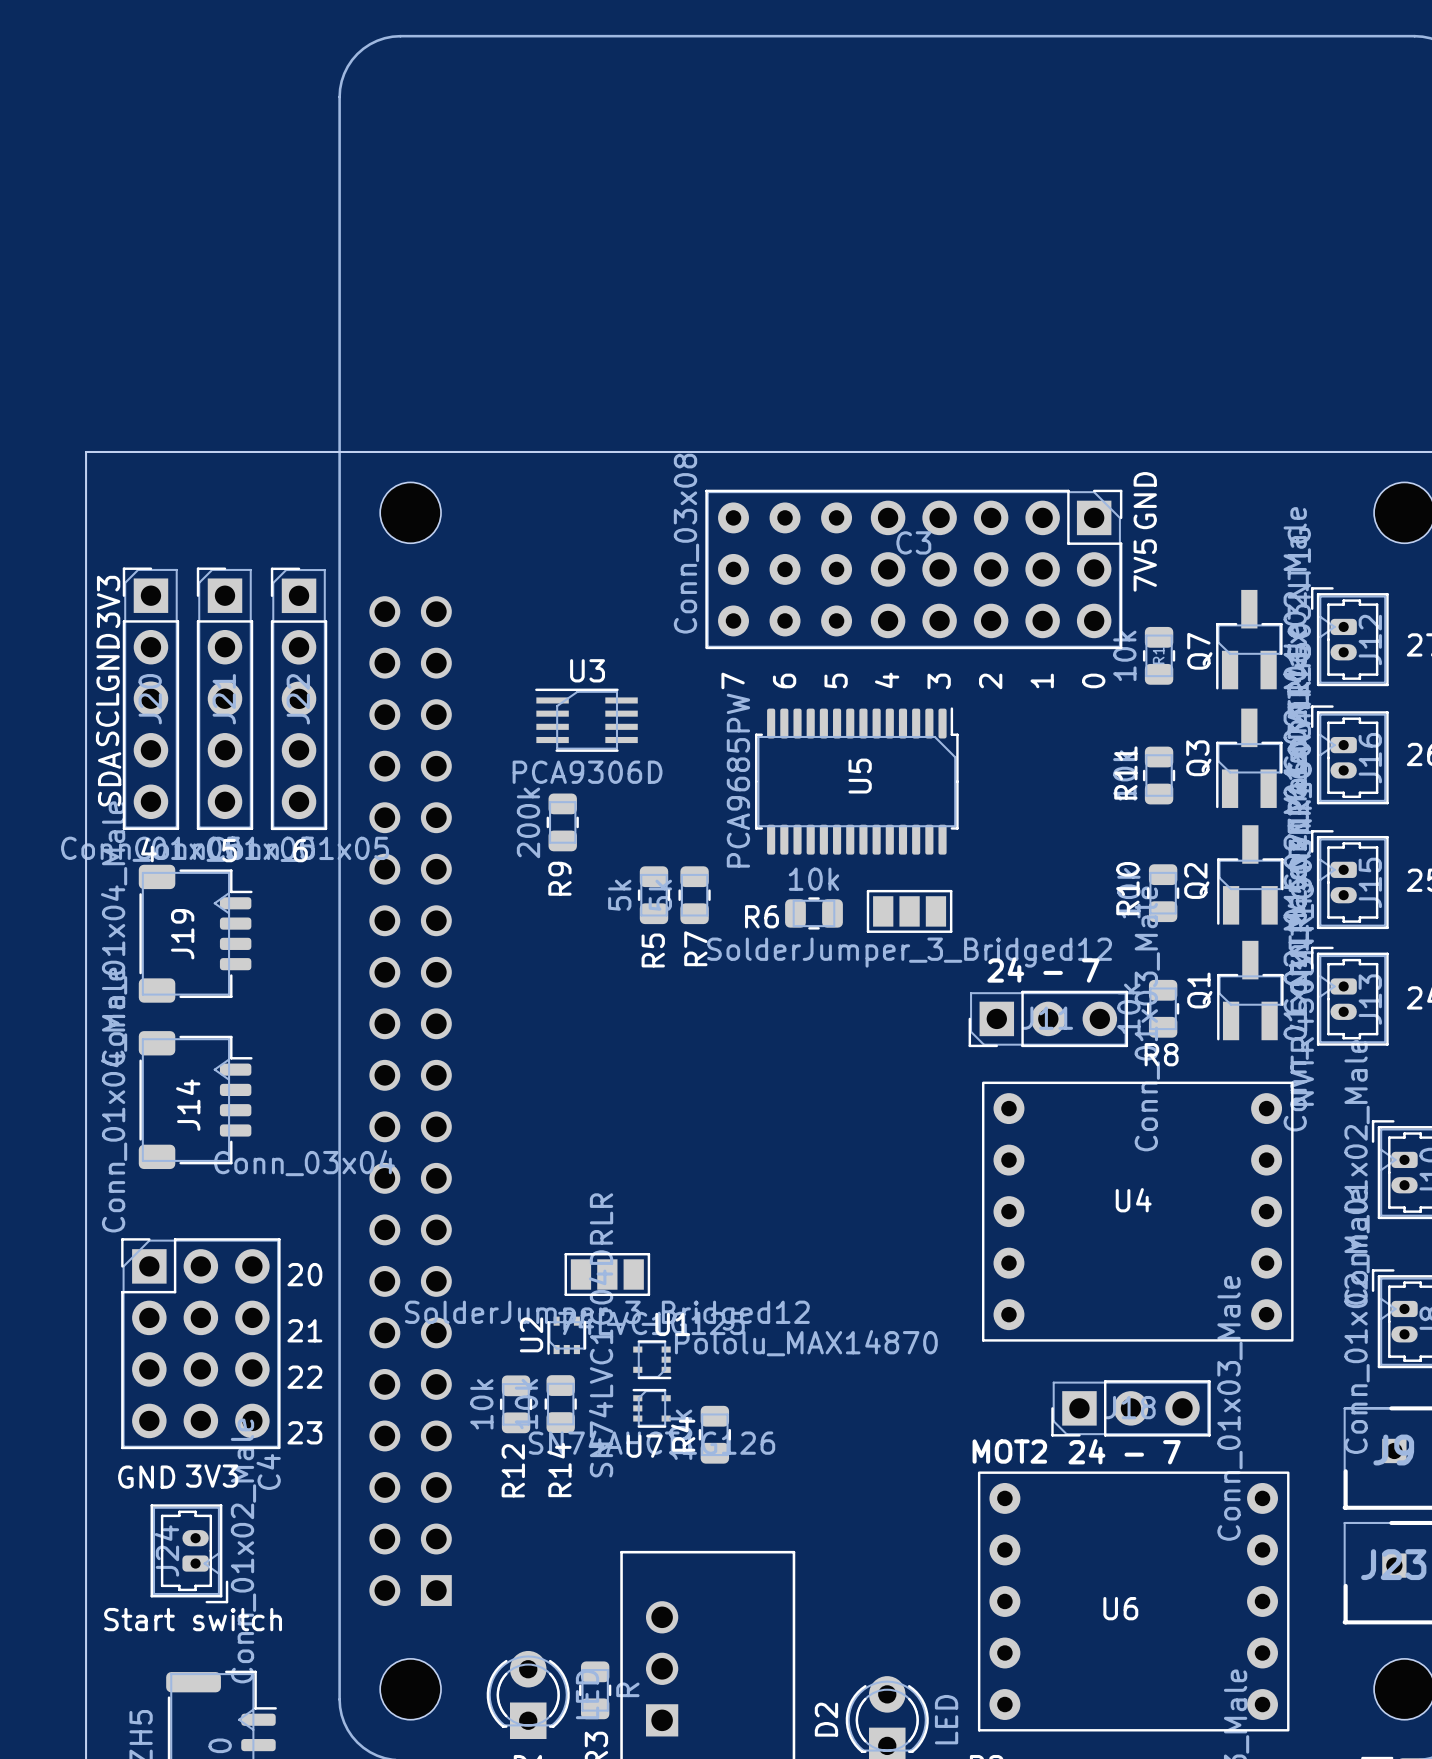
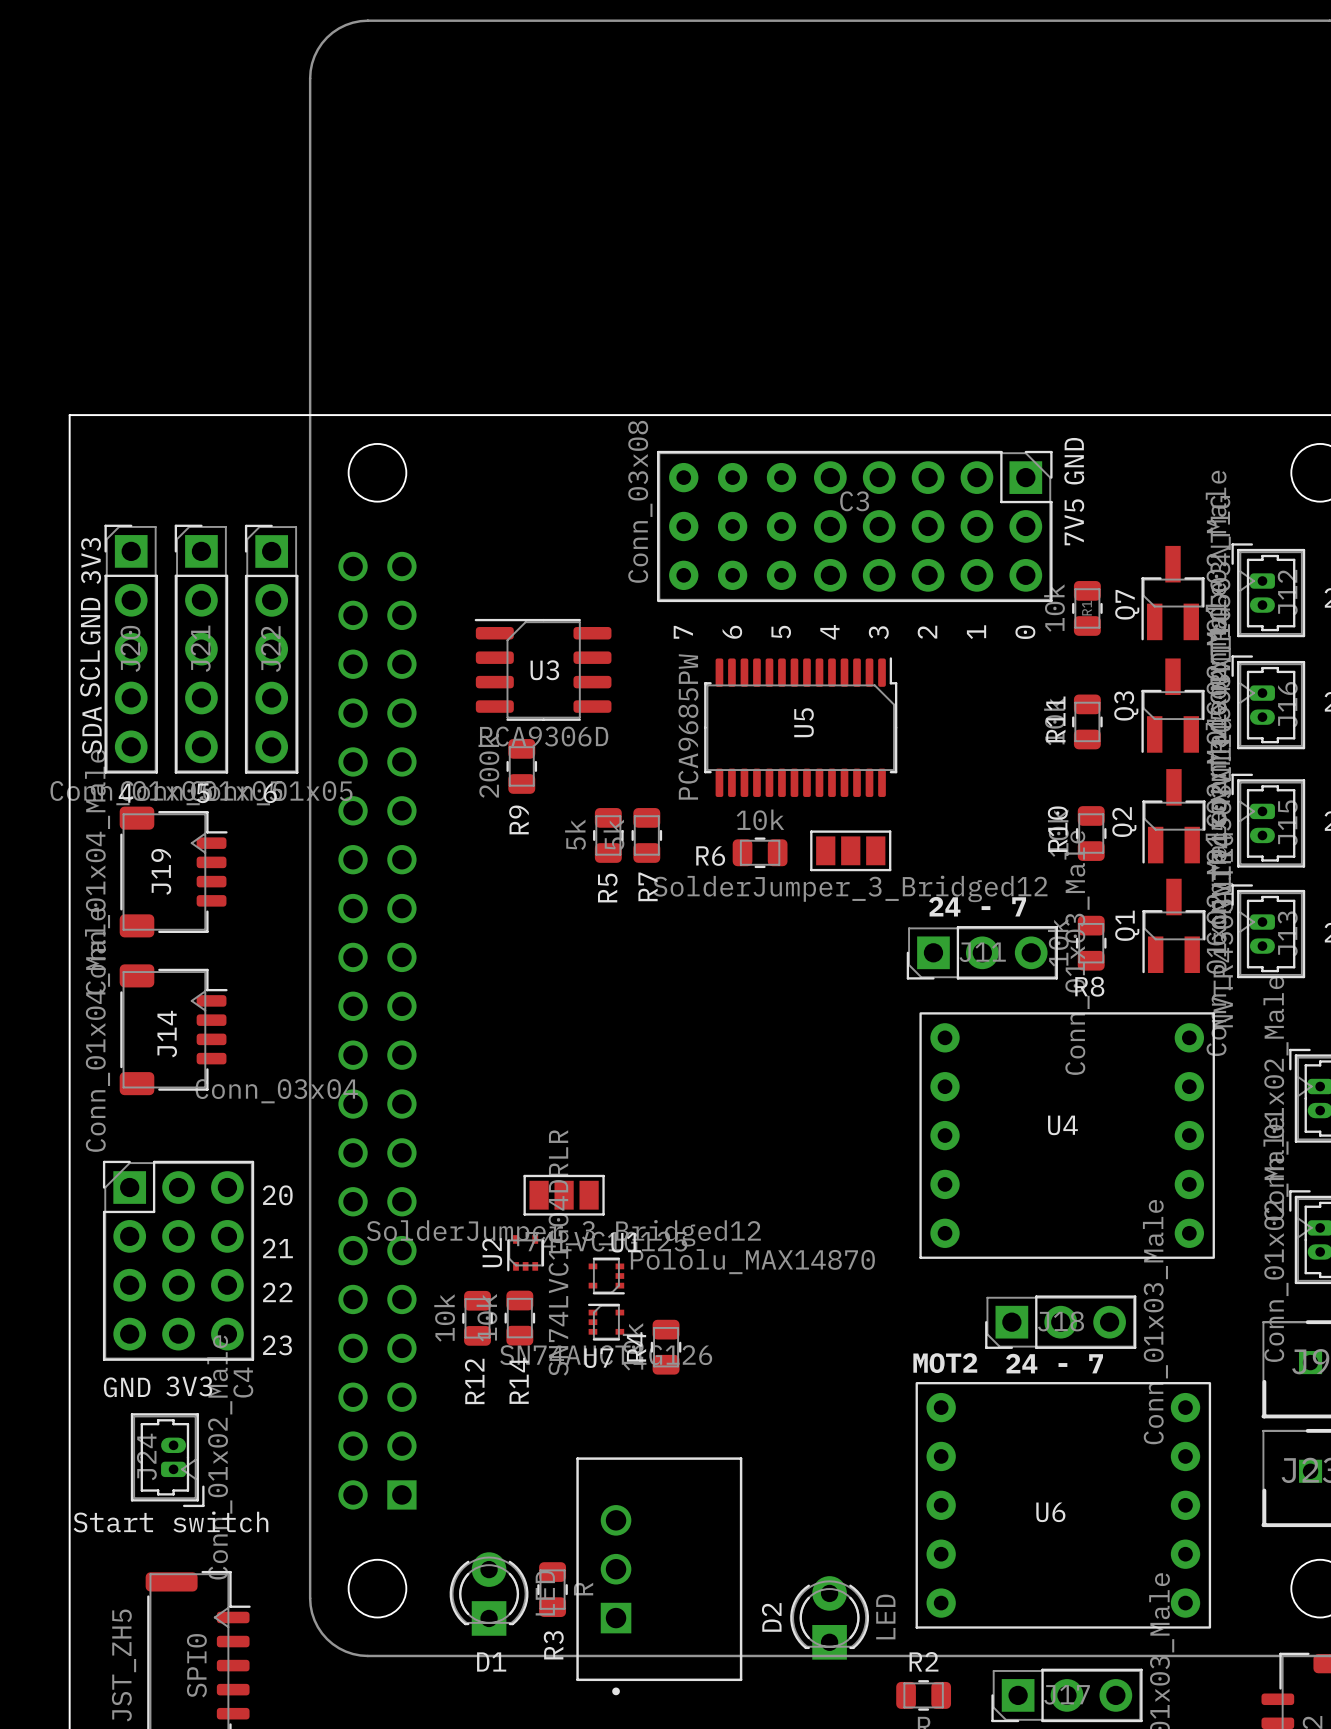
U3 name position: U3 (587, 670) -> U3 (544, 670)
U3 footprint: [535, 688, 638, 752] -> [474, 618, 612, 721]

